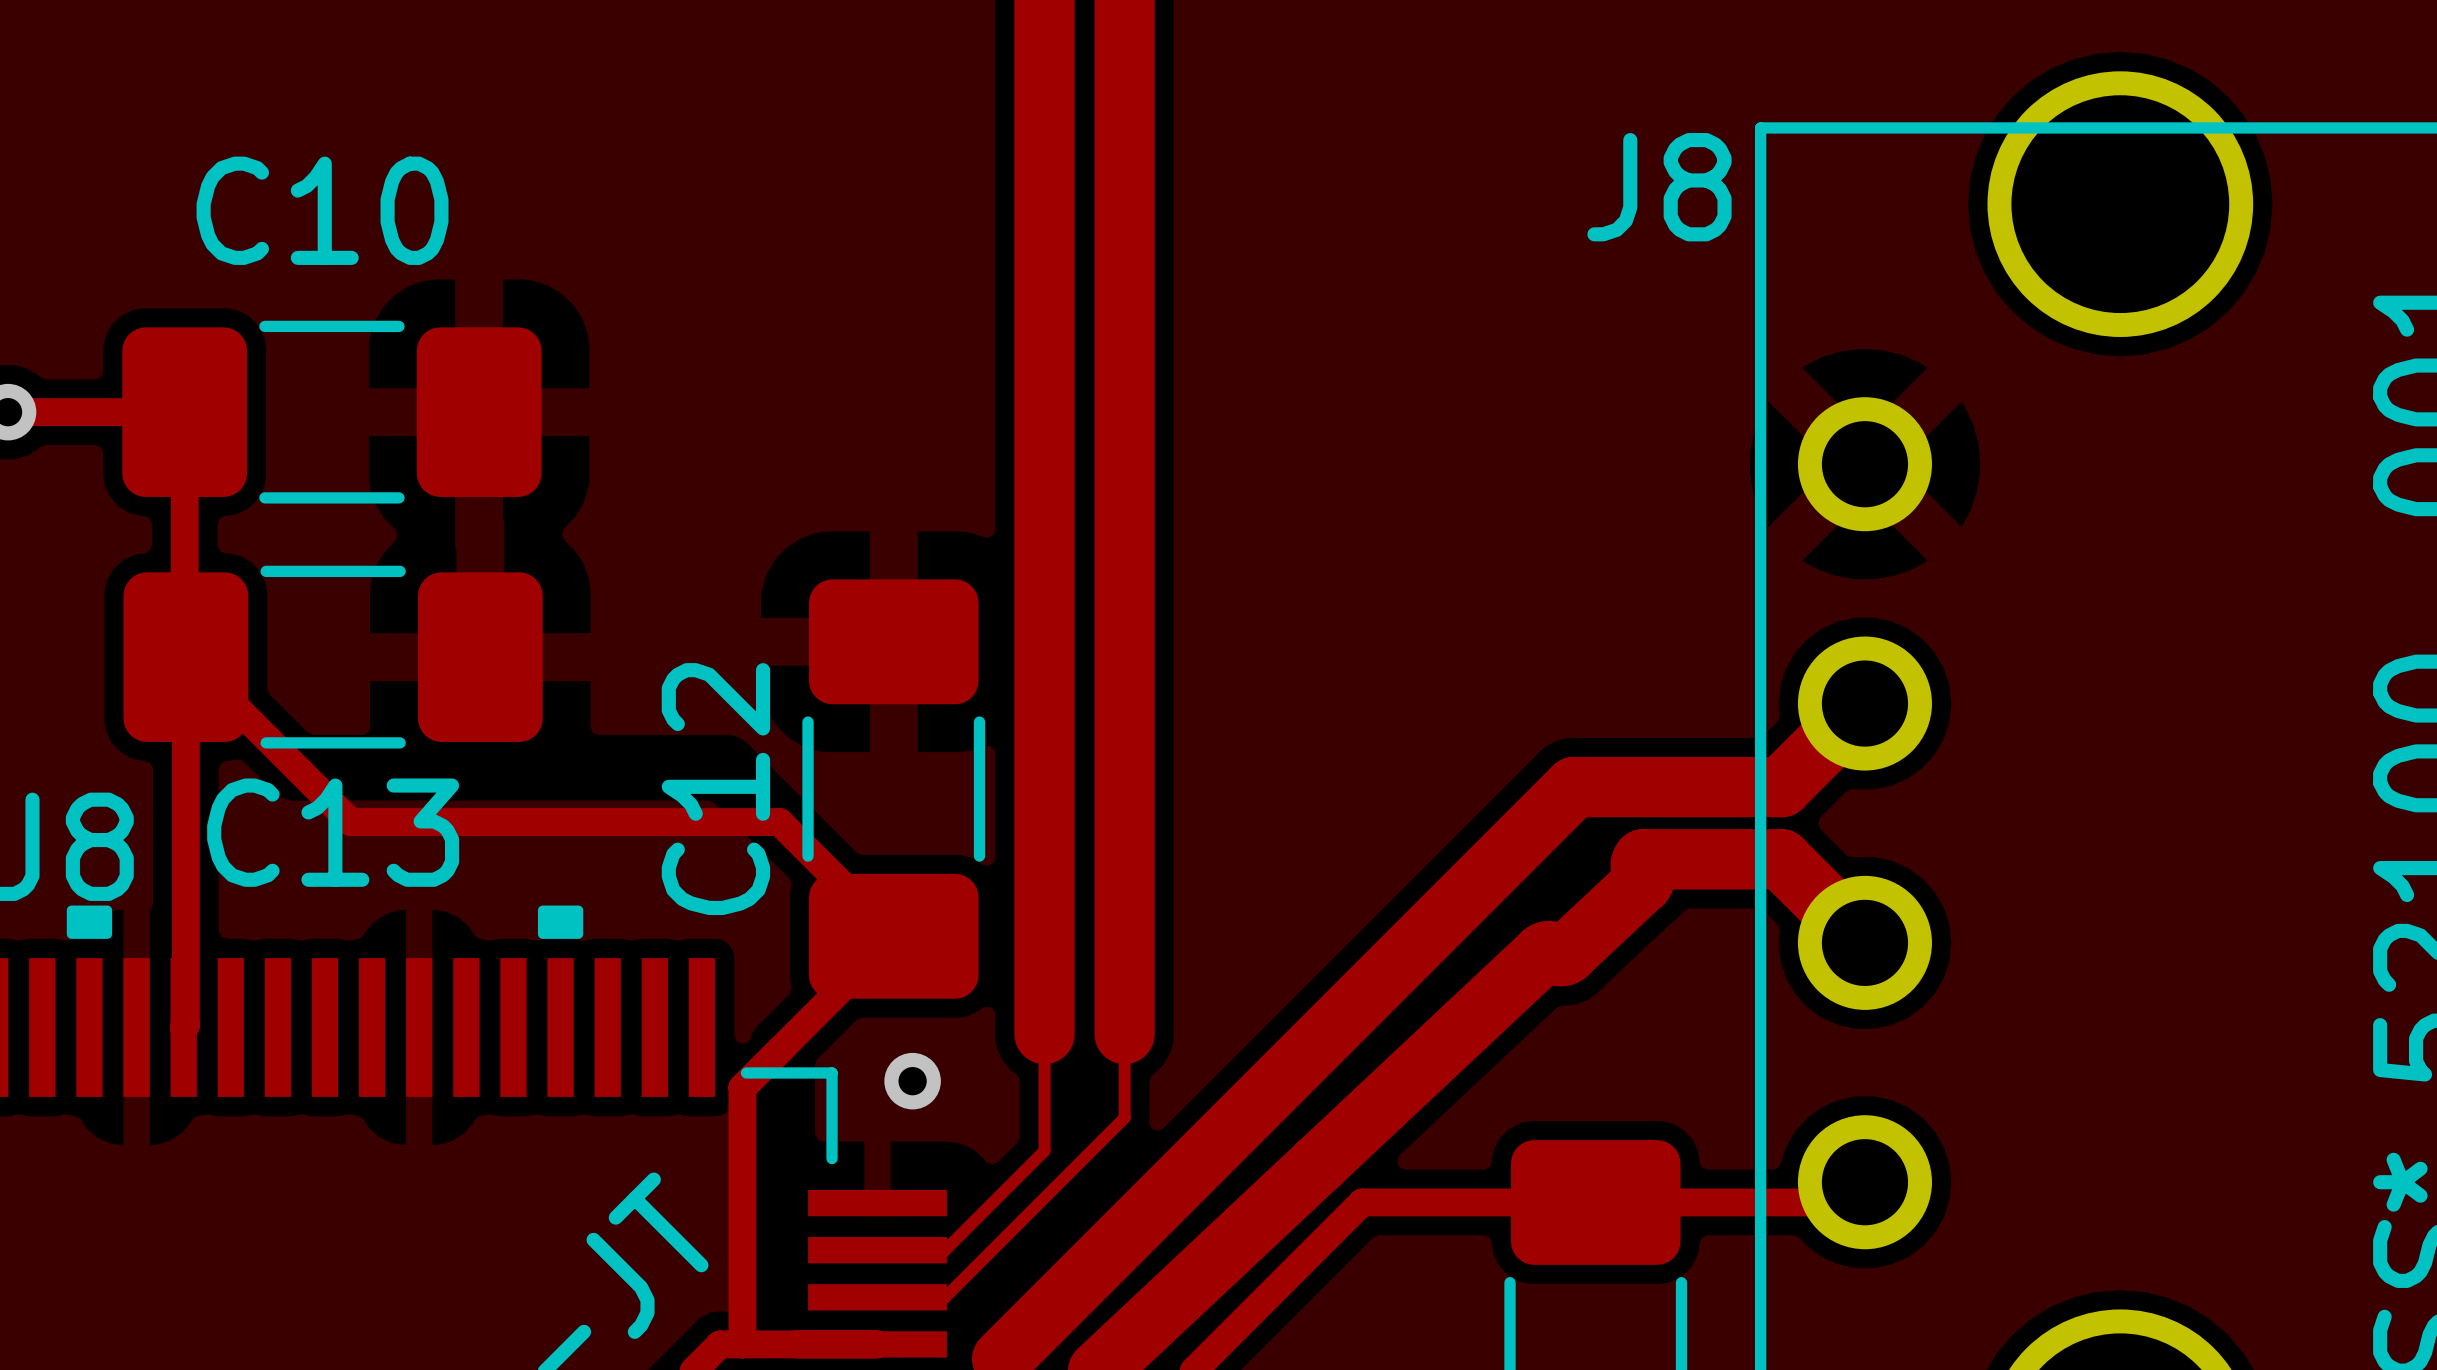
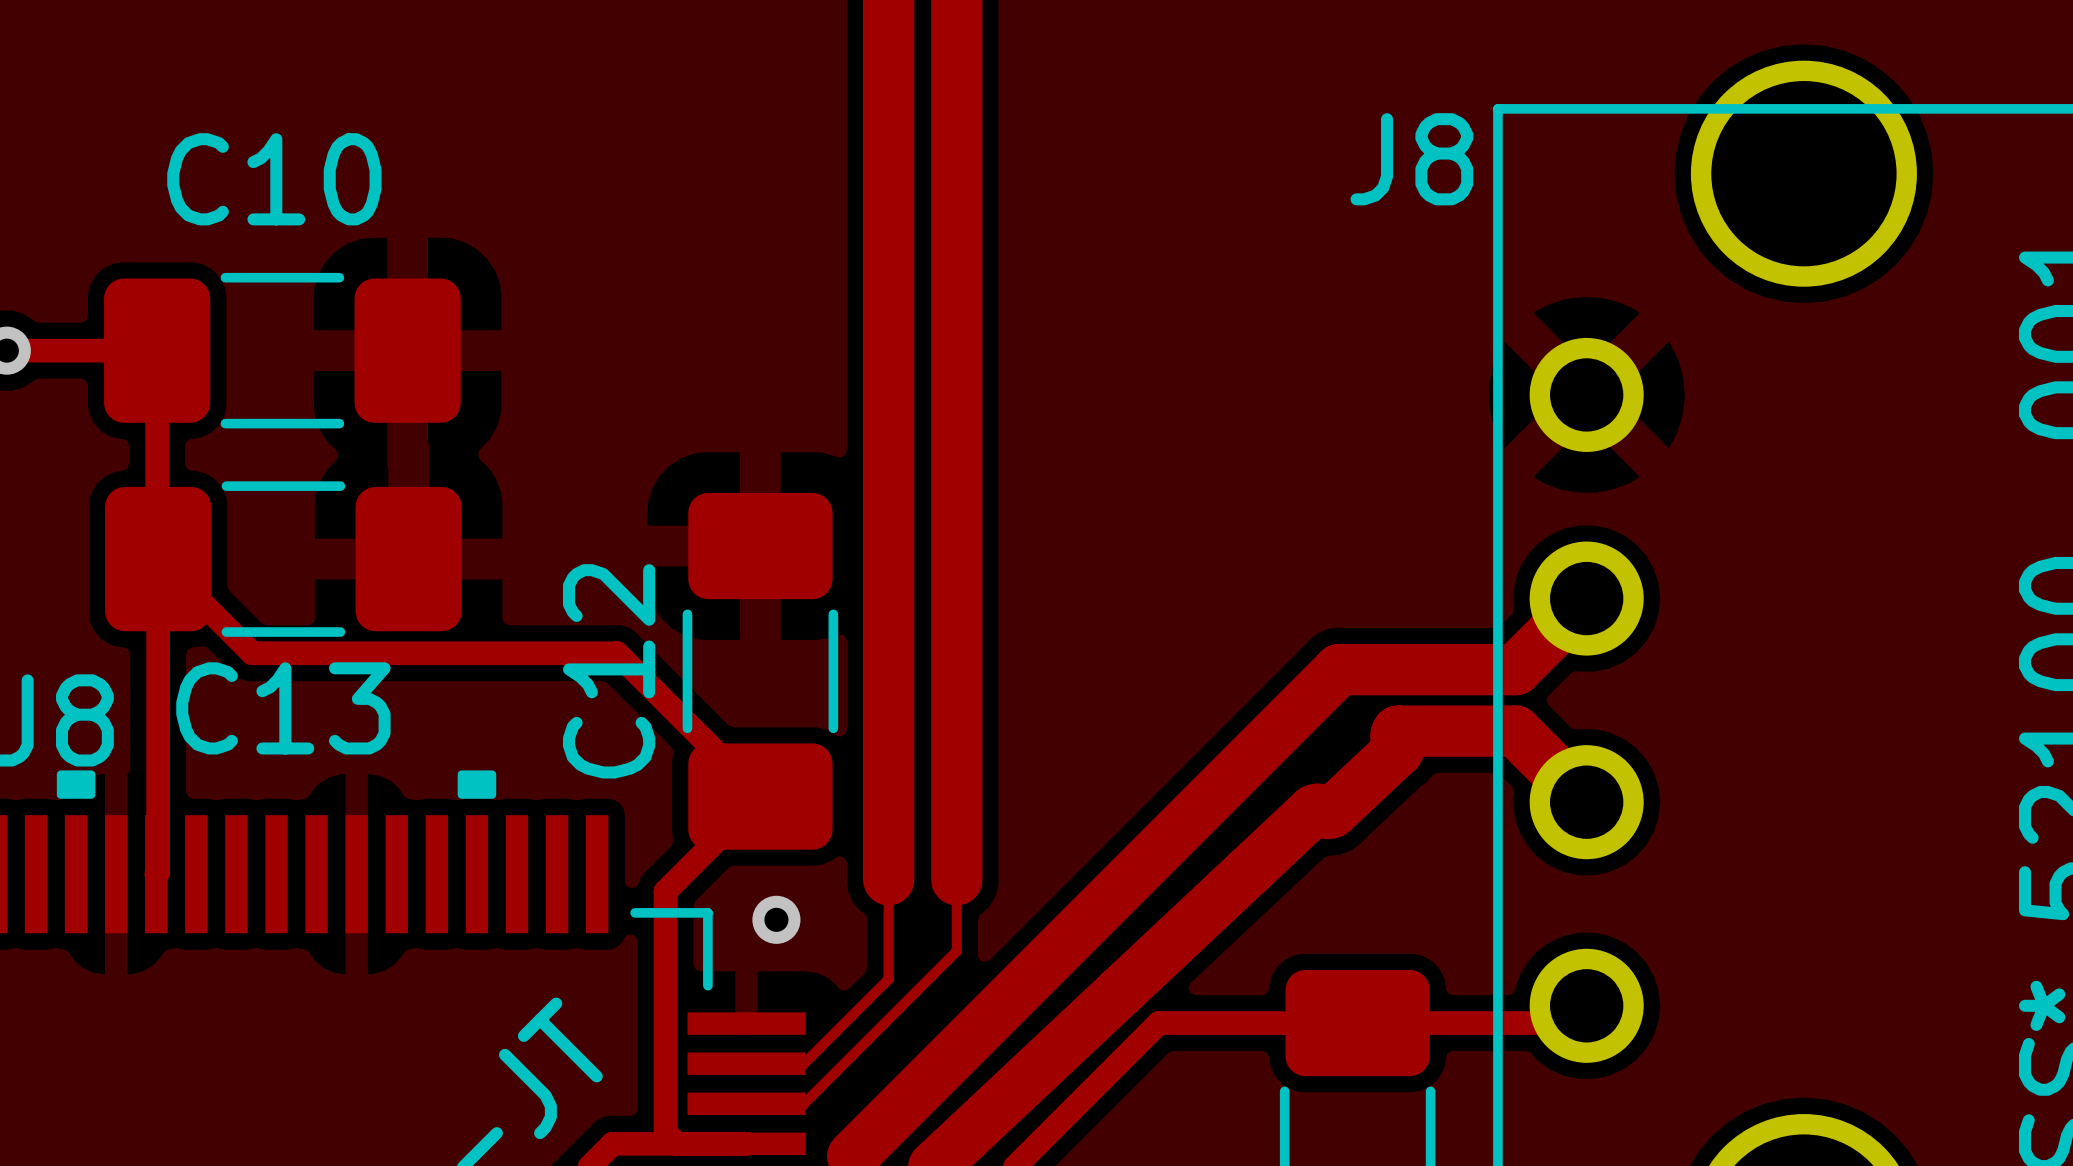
track: (296, 767) (350, 822) (779, 822) -> (252, 653) (617, 653) (663, 699)
track: (782, 1047) (742, 1087) (742, 1344) -> (665, 891) (665, 1132) (676, 1143)

